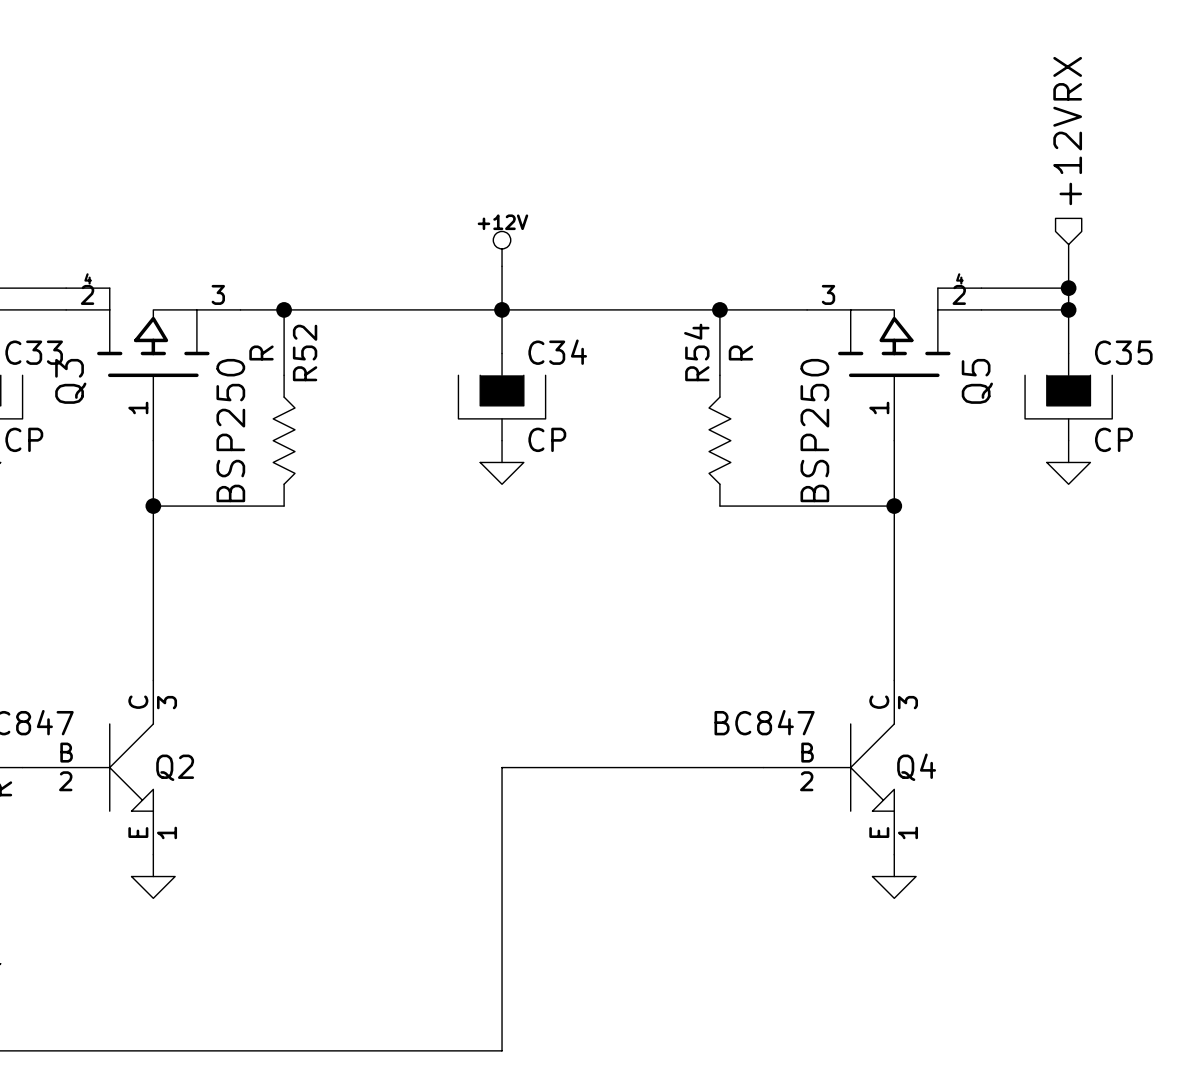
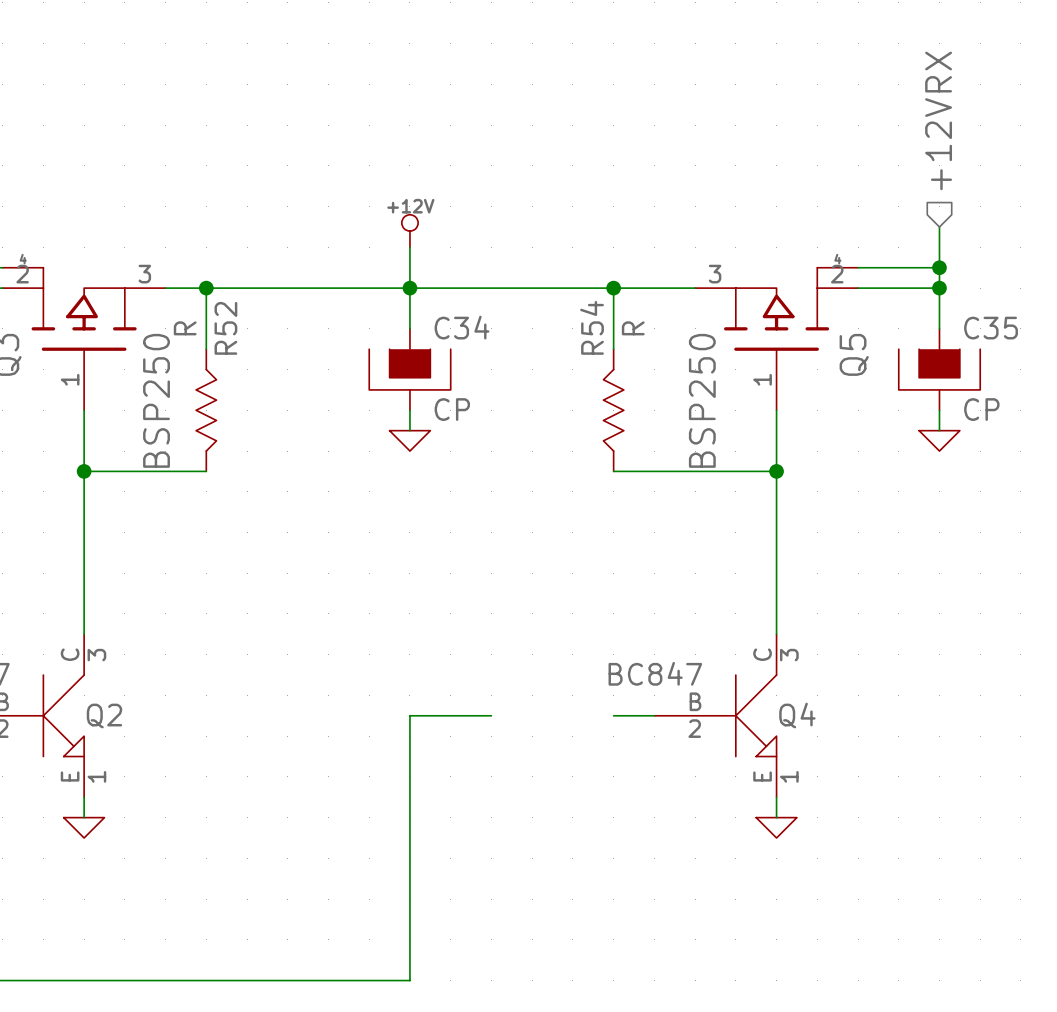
wire: (589, 767) (719, 767) -> none

